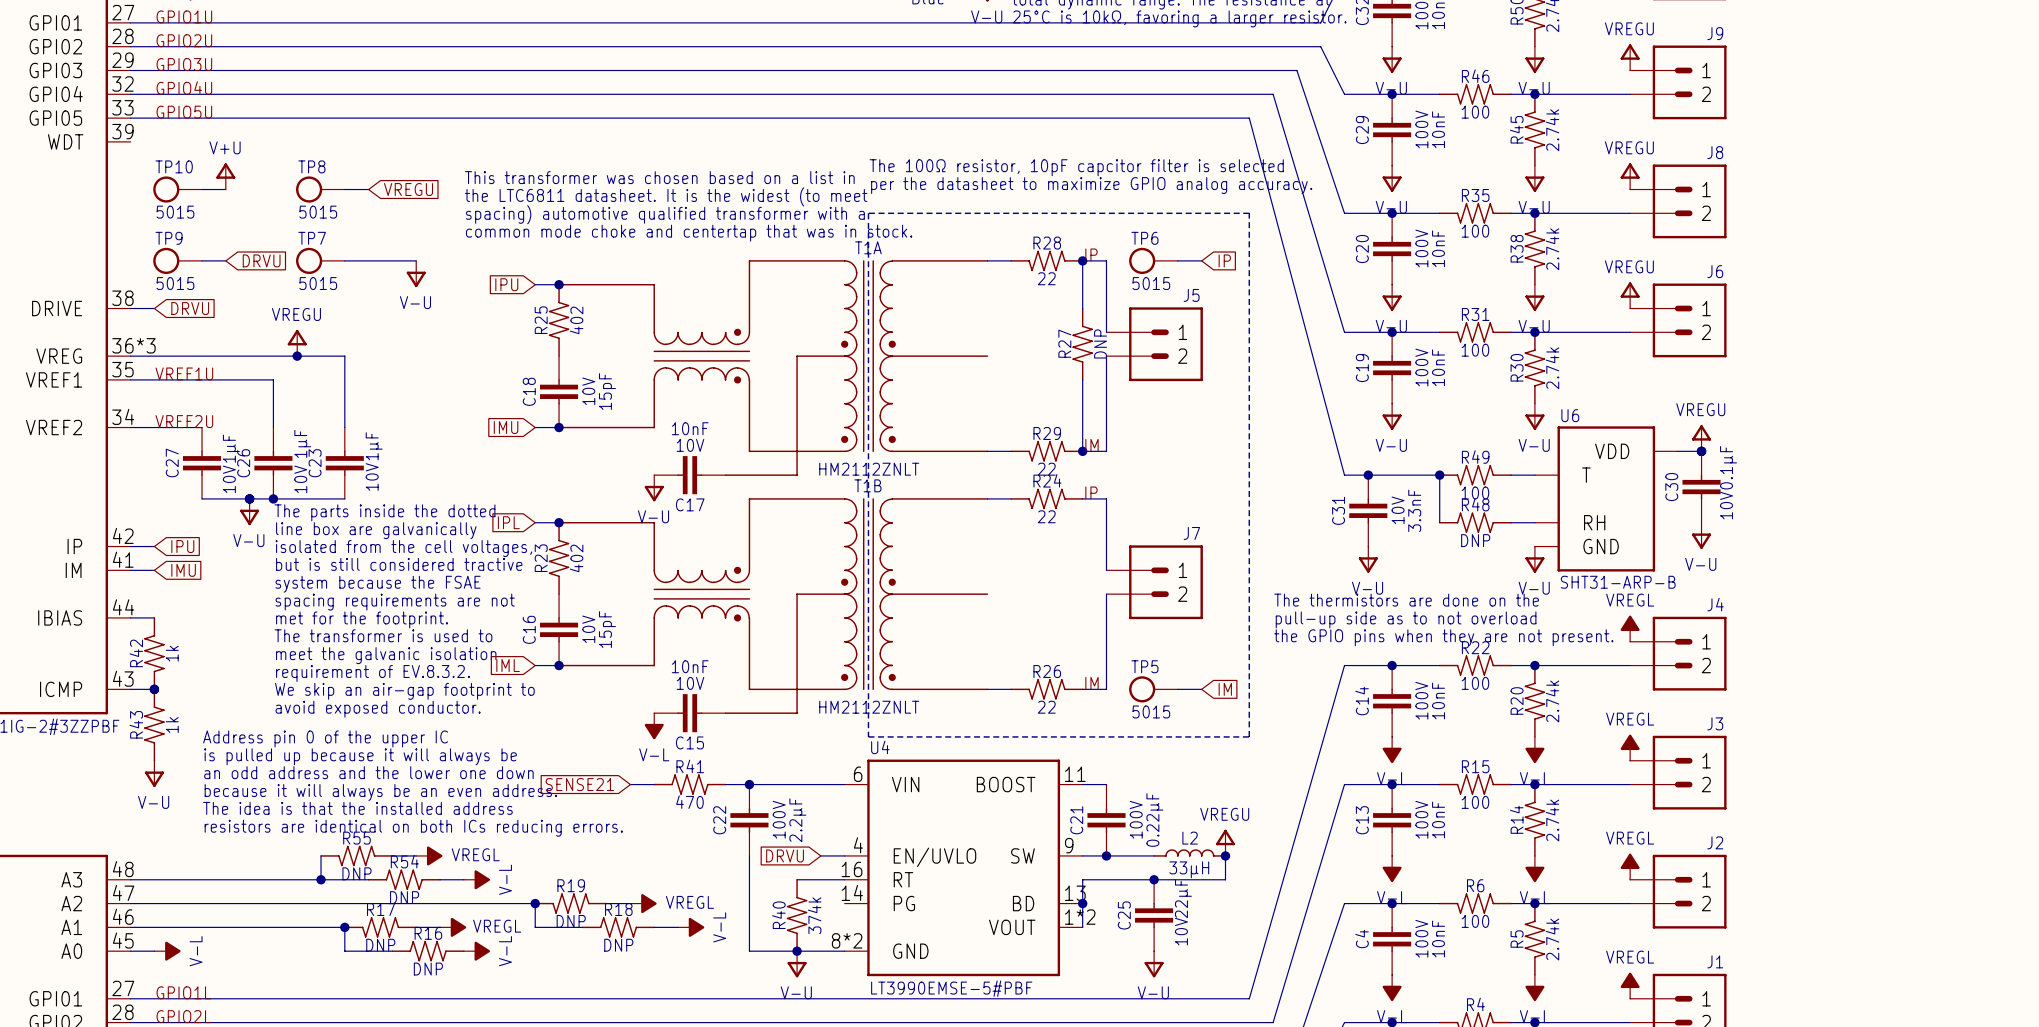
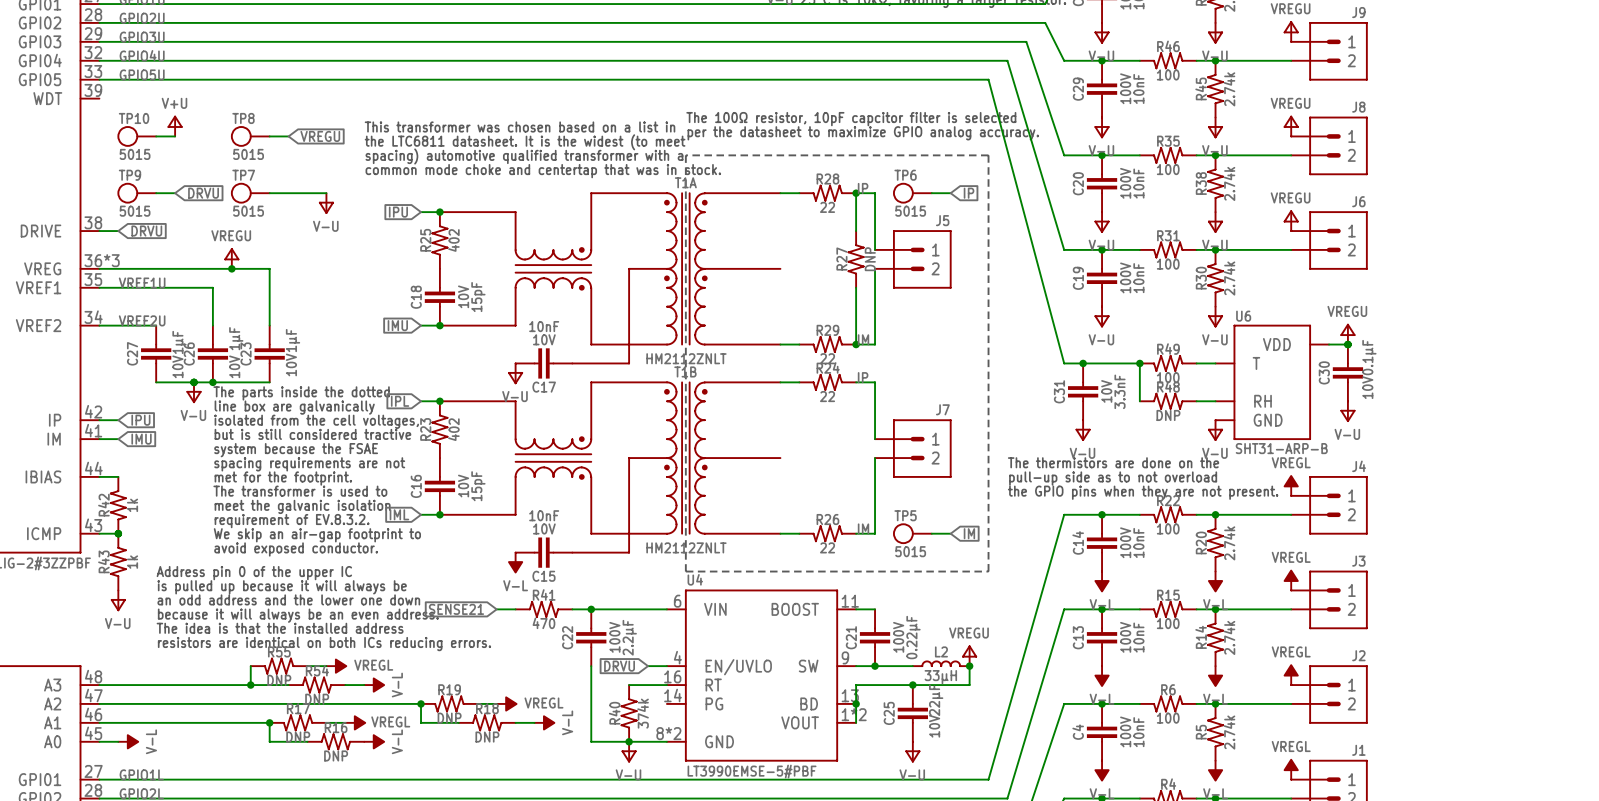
T1A symbol: [558, 260, 989, 476] -> [439, 192, 782, 365]
T1B symbol: [558, 498, 989, 714] -> [439, 381, 782, 554]

